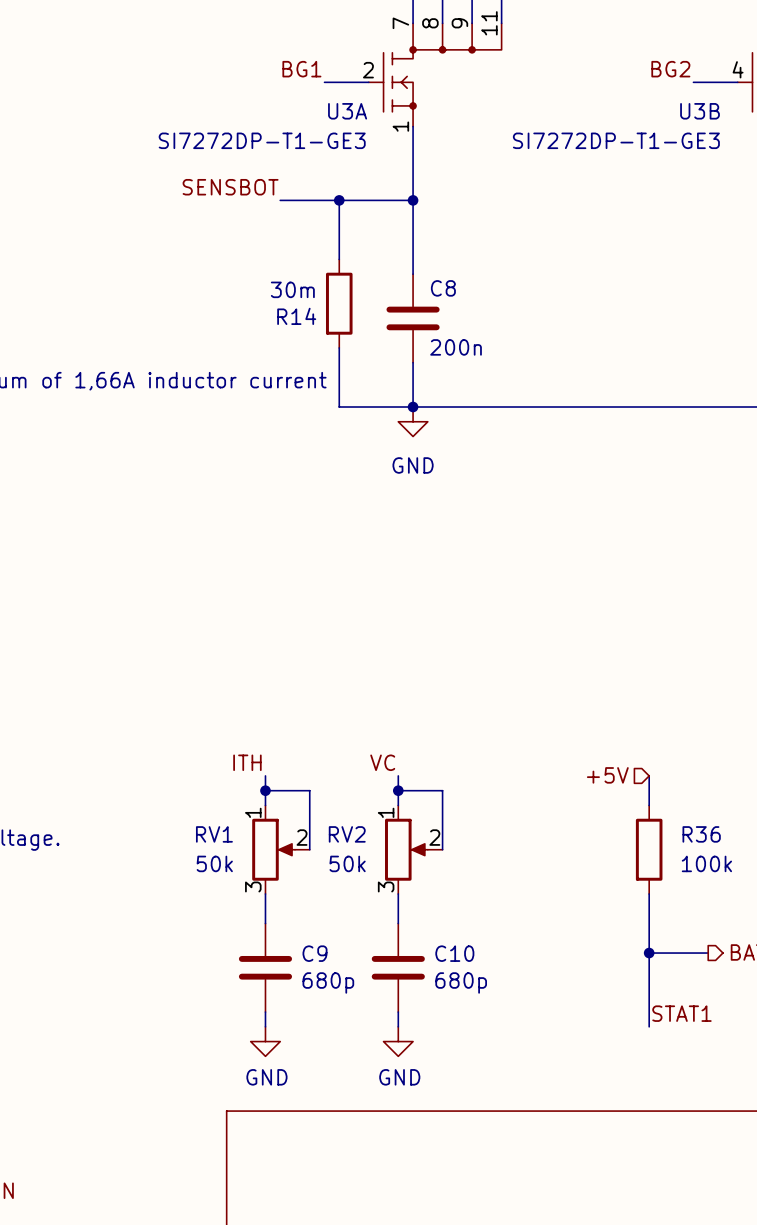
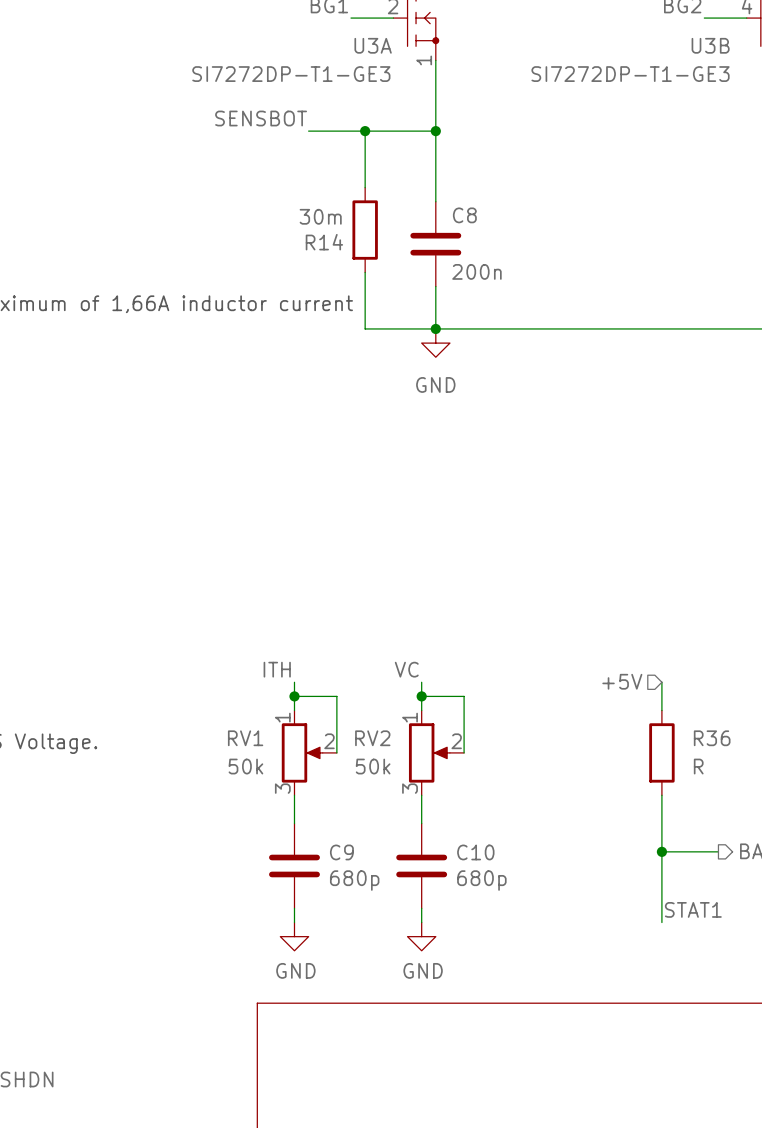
R36 value: 100k (706, 863) -> R (698, 766)

